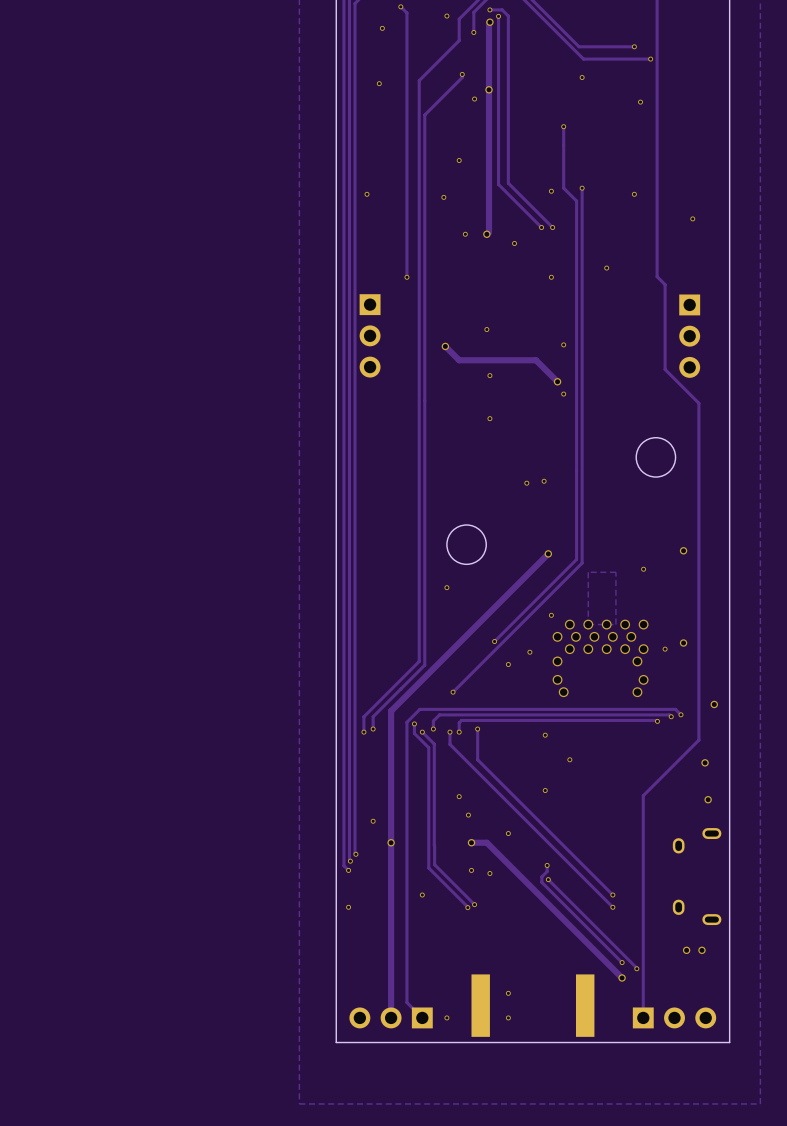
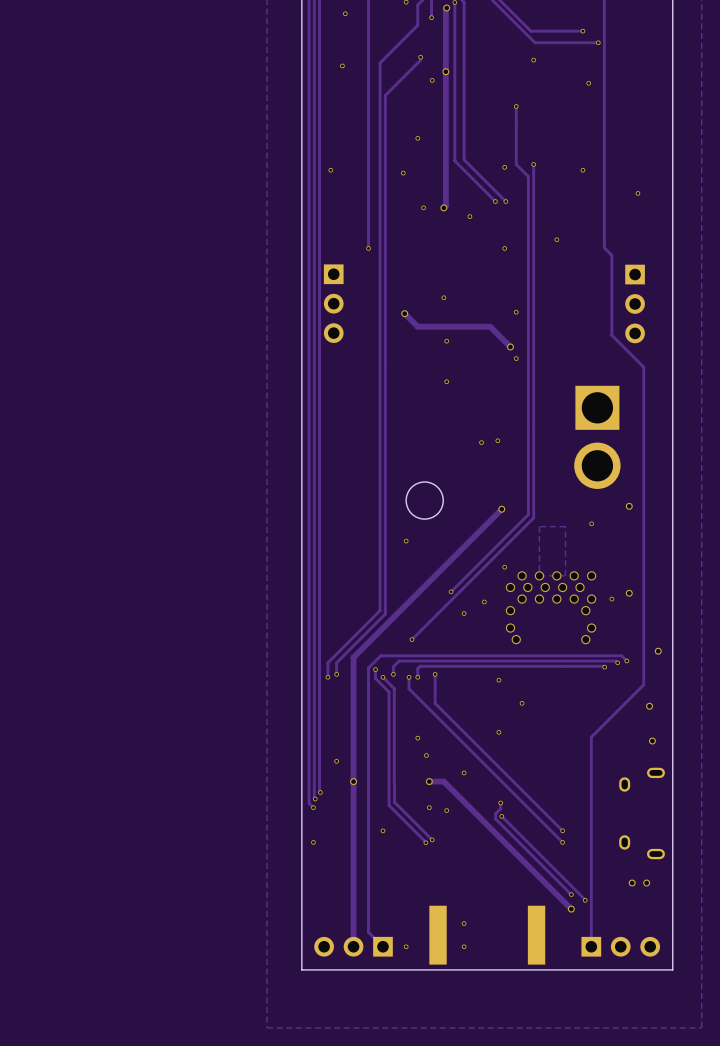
round board edge: [635, 437, 676, 478] -> none
part: none -> (597, 437)

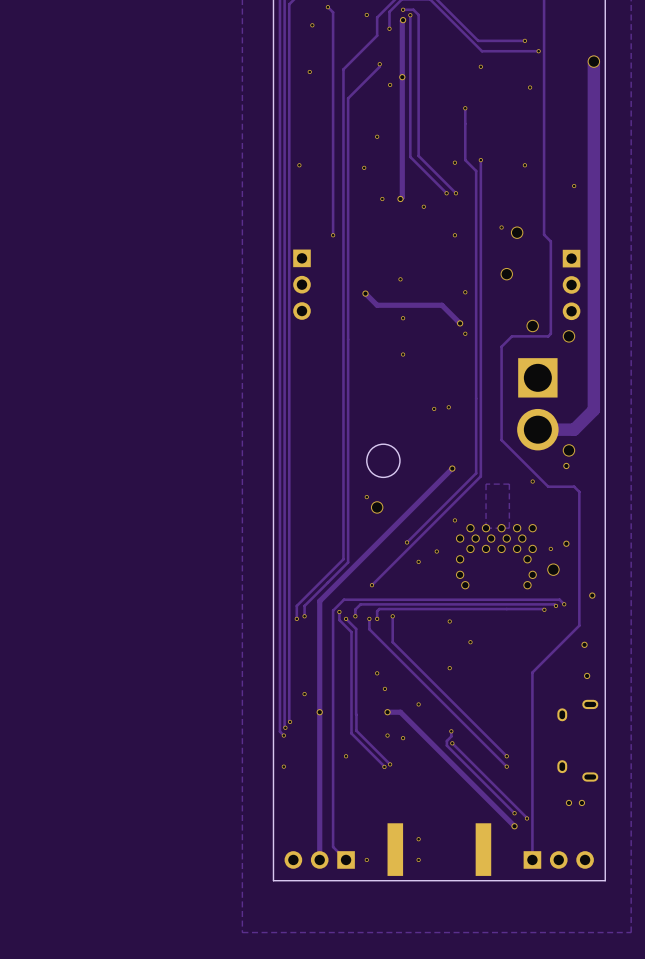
track: none -> (593, 61) (593, 409) (574, 429) (537, 429)
via: none -> (593, 61)
via: none -> (517, 232)
via: none -> (506, 274)
track: (611, 335) (643, 367) (643, 535) -> (550, 313) (550, 333) (548, 336) (511, 336) (501, 346) (501, 440) (548, 486) (574, 486) (579, 491)
via: none -> (532, 326)
via: none -> (568, 336)
via: none -> (568, 450)
via: none -> (377, 507)
via: none -> (553, 569)

